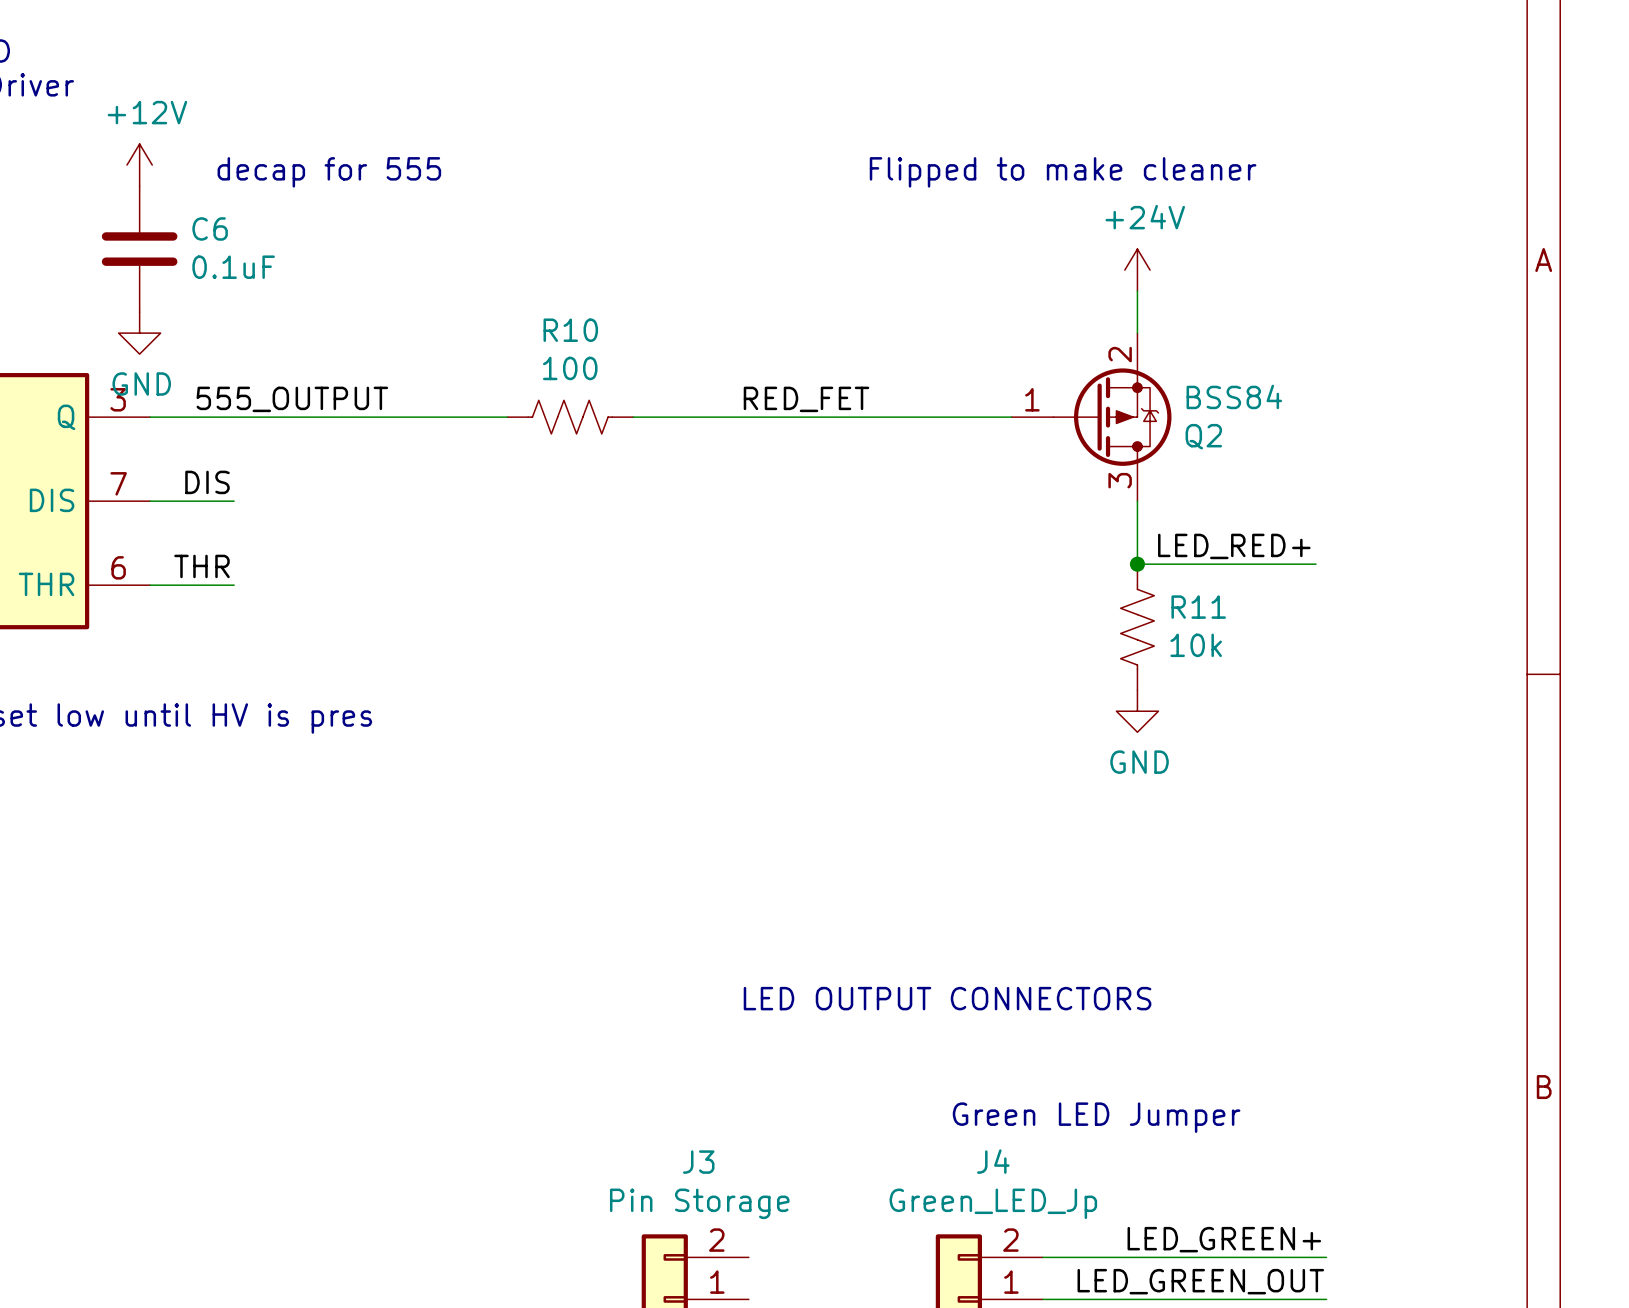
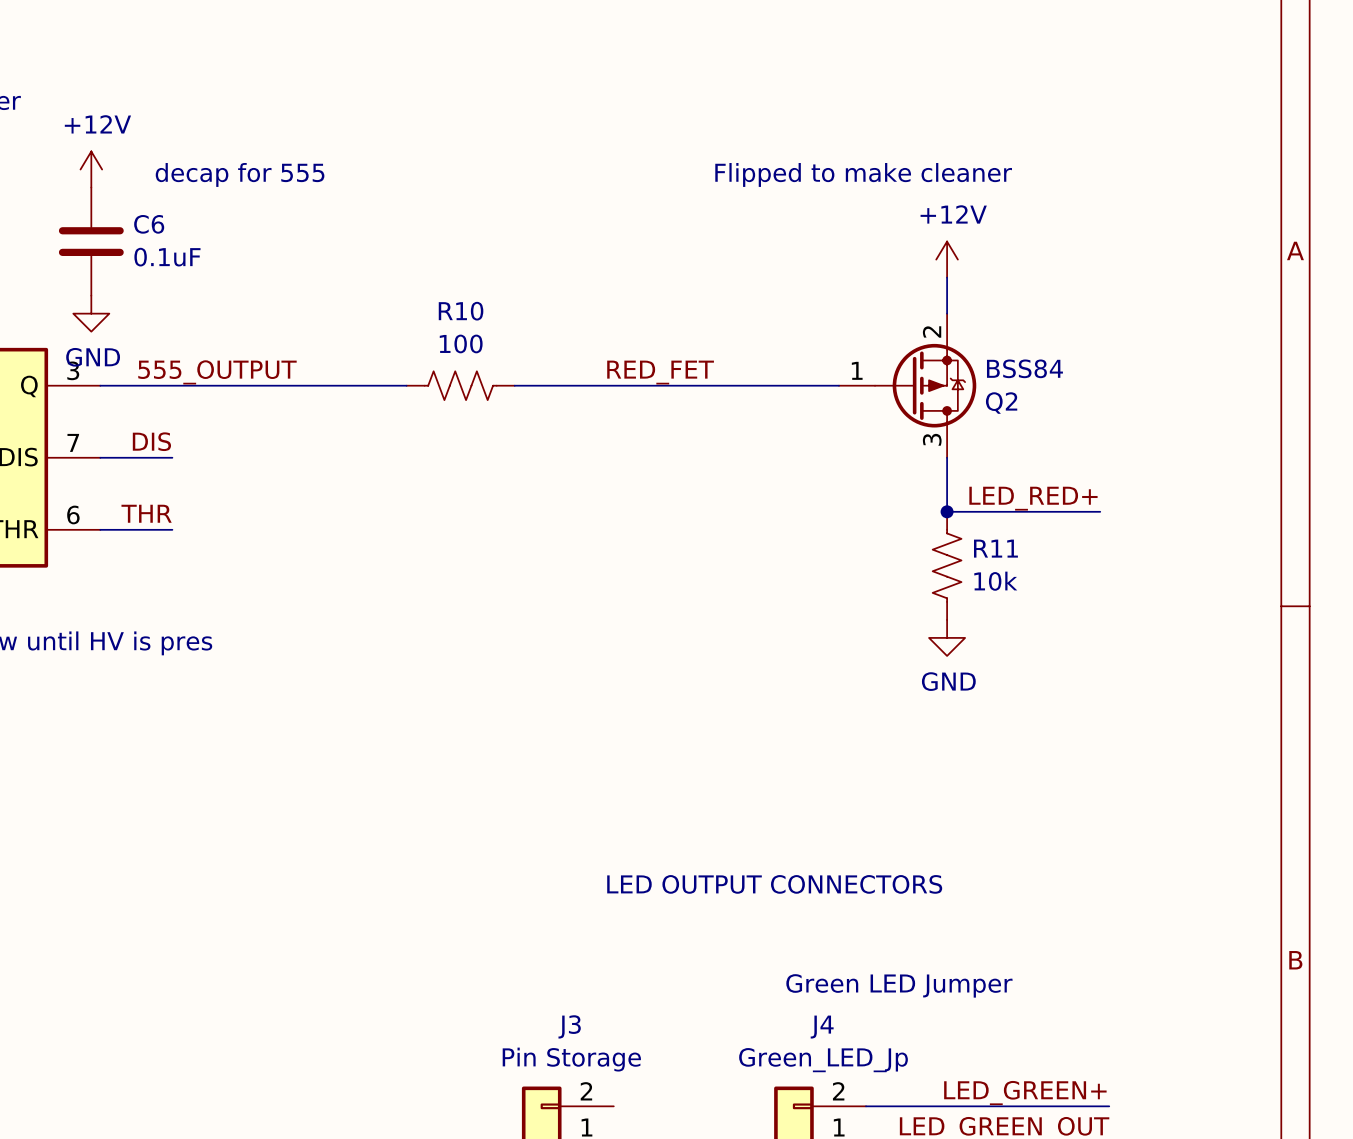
power symbol: +24V (1137, 270) -> +12V (947, 259)

